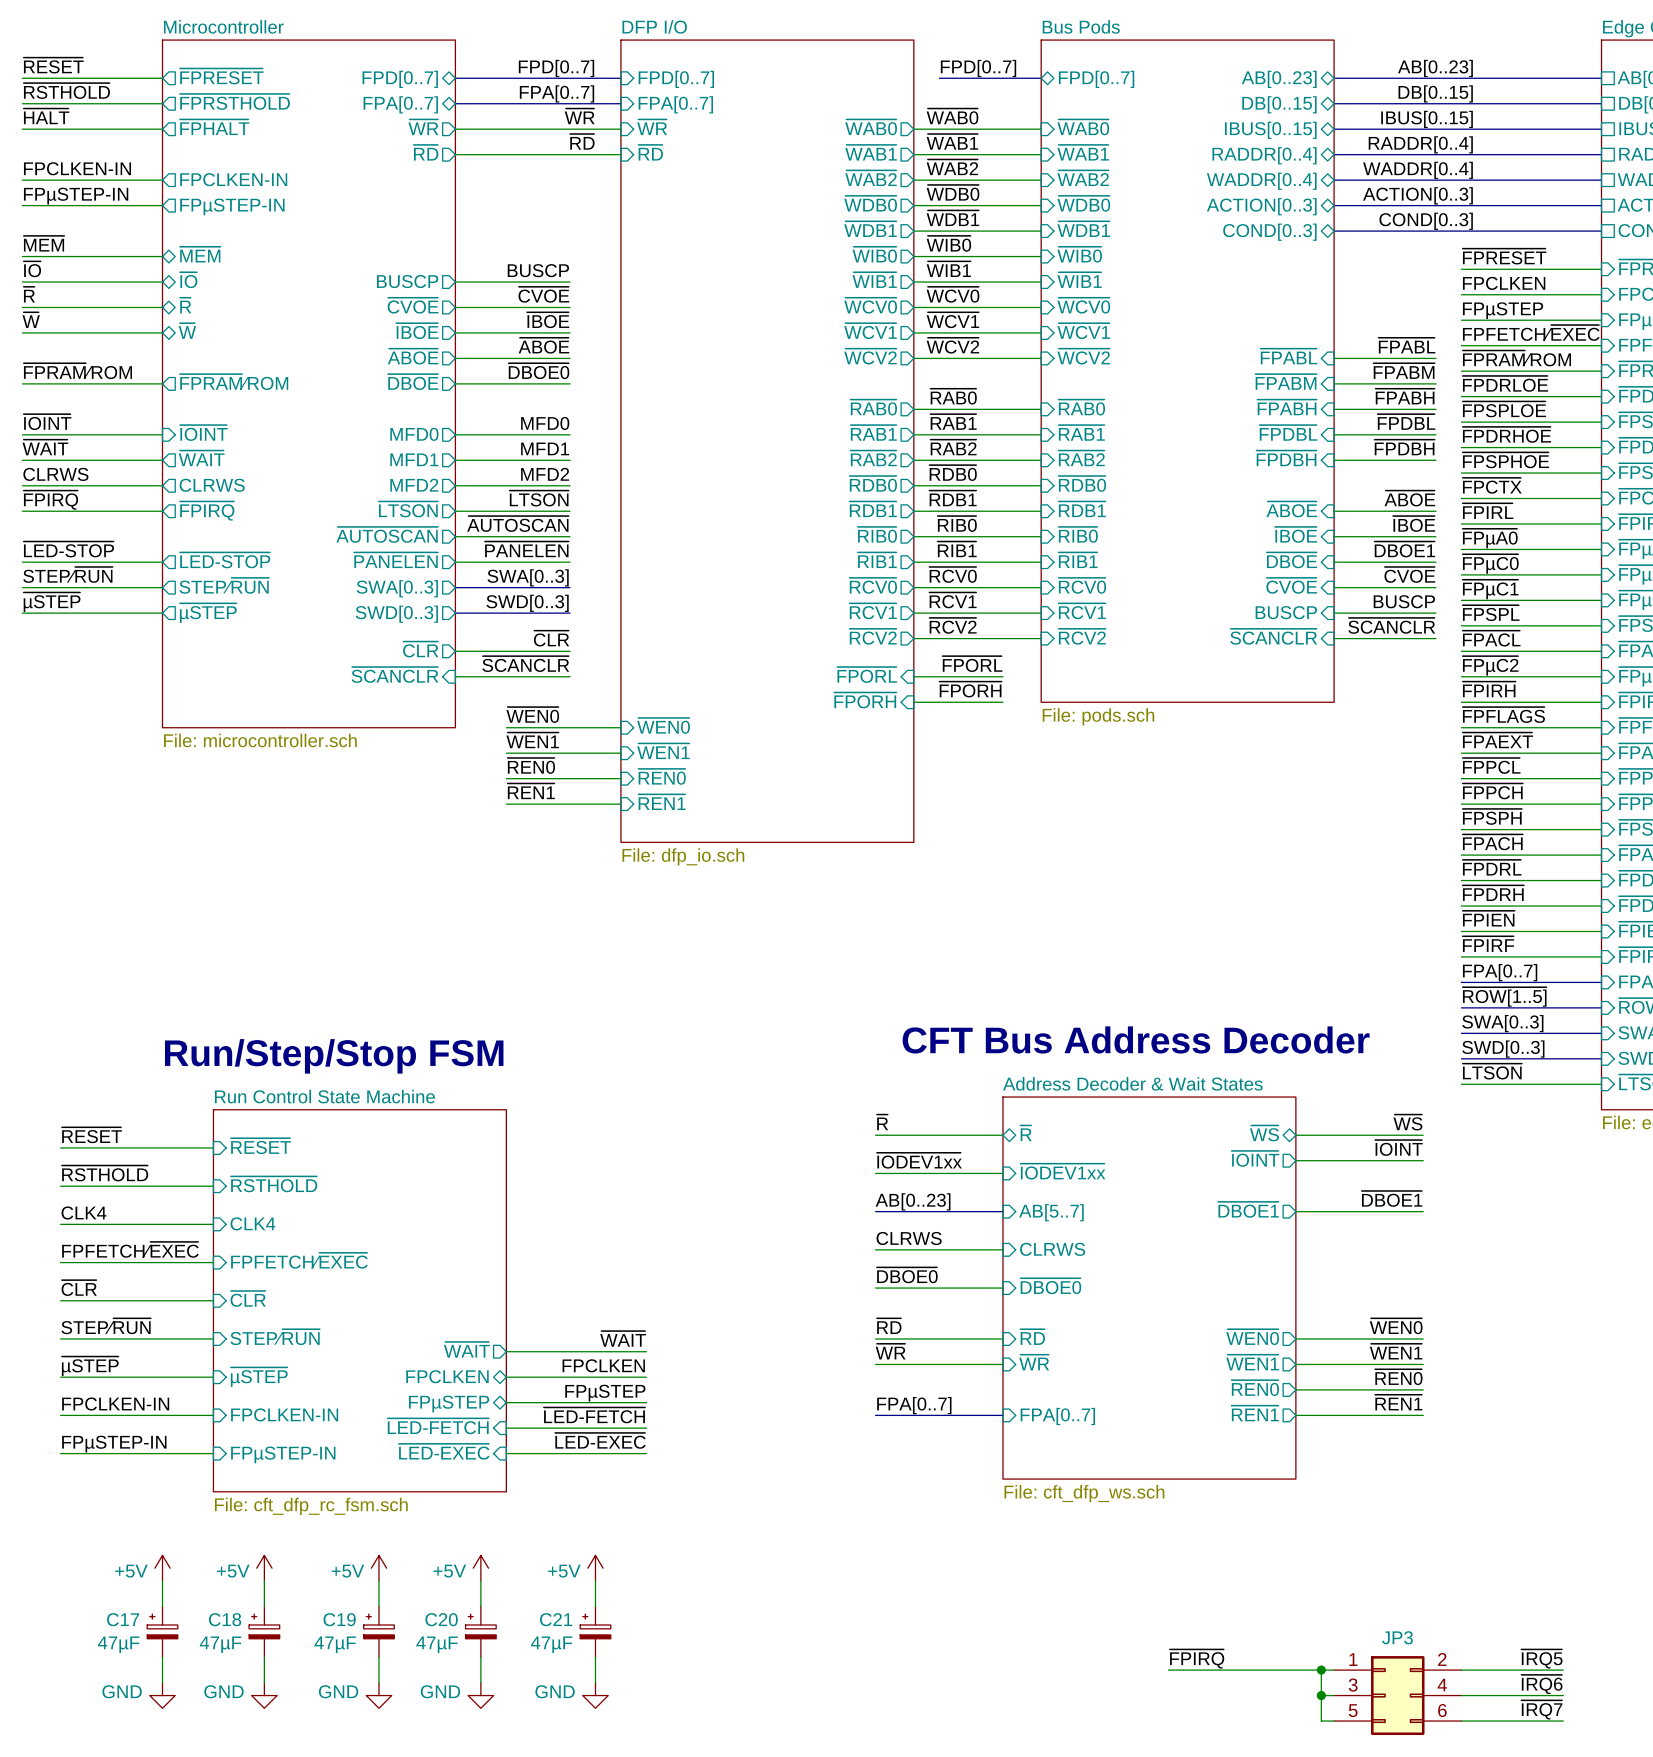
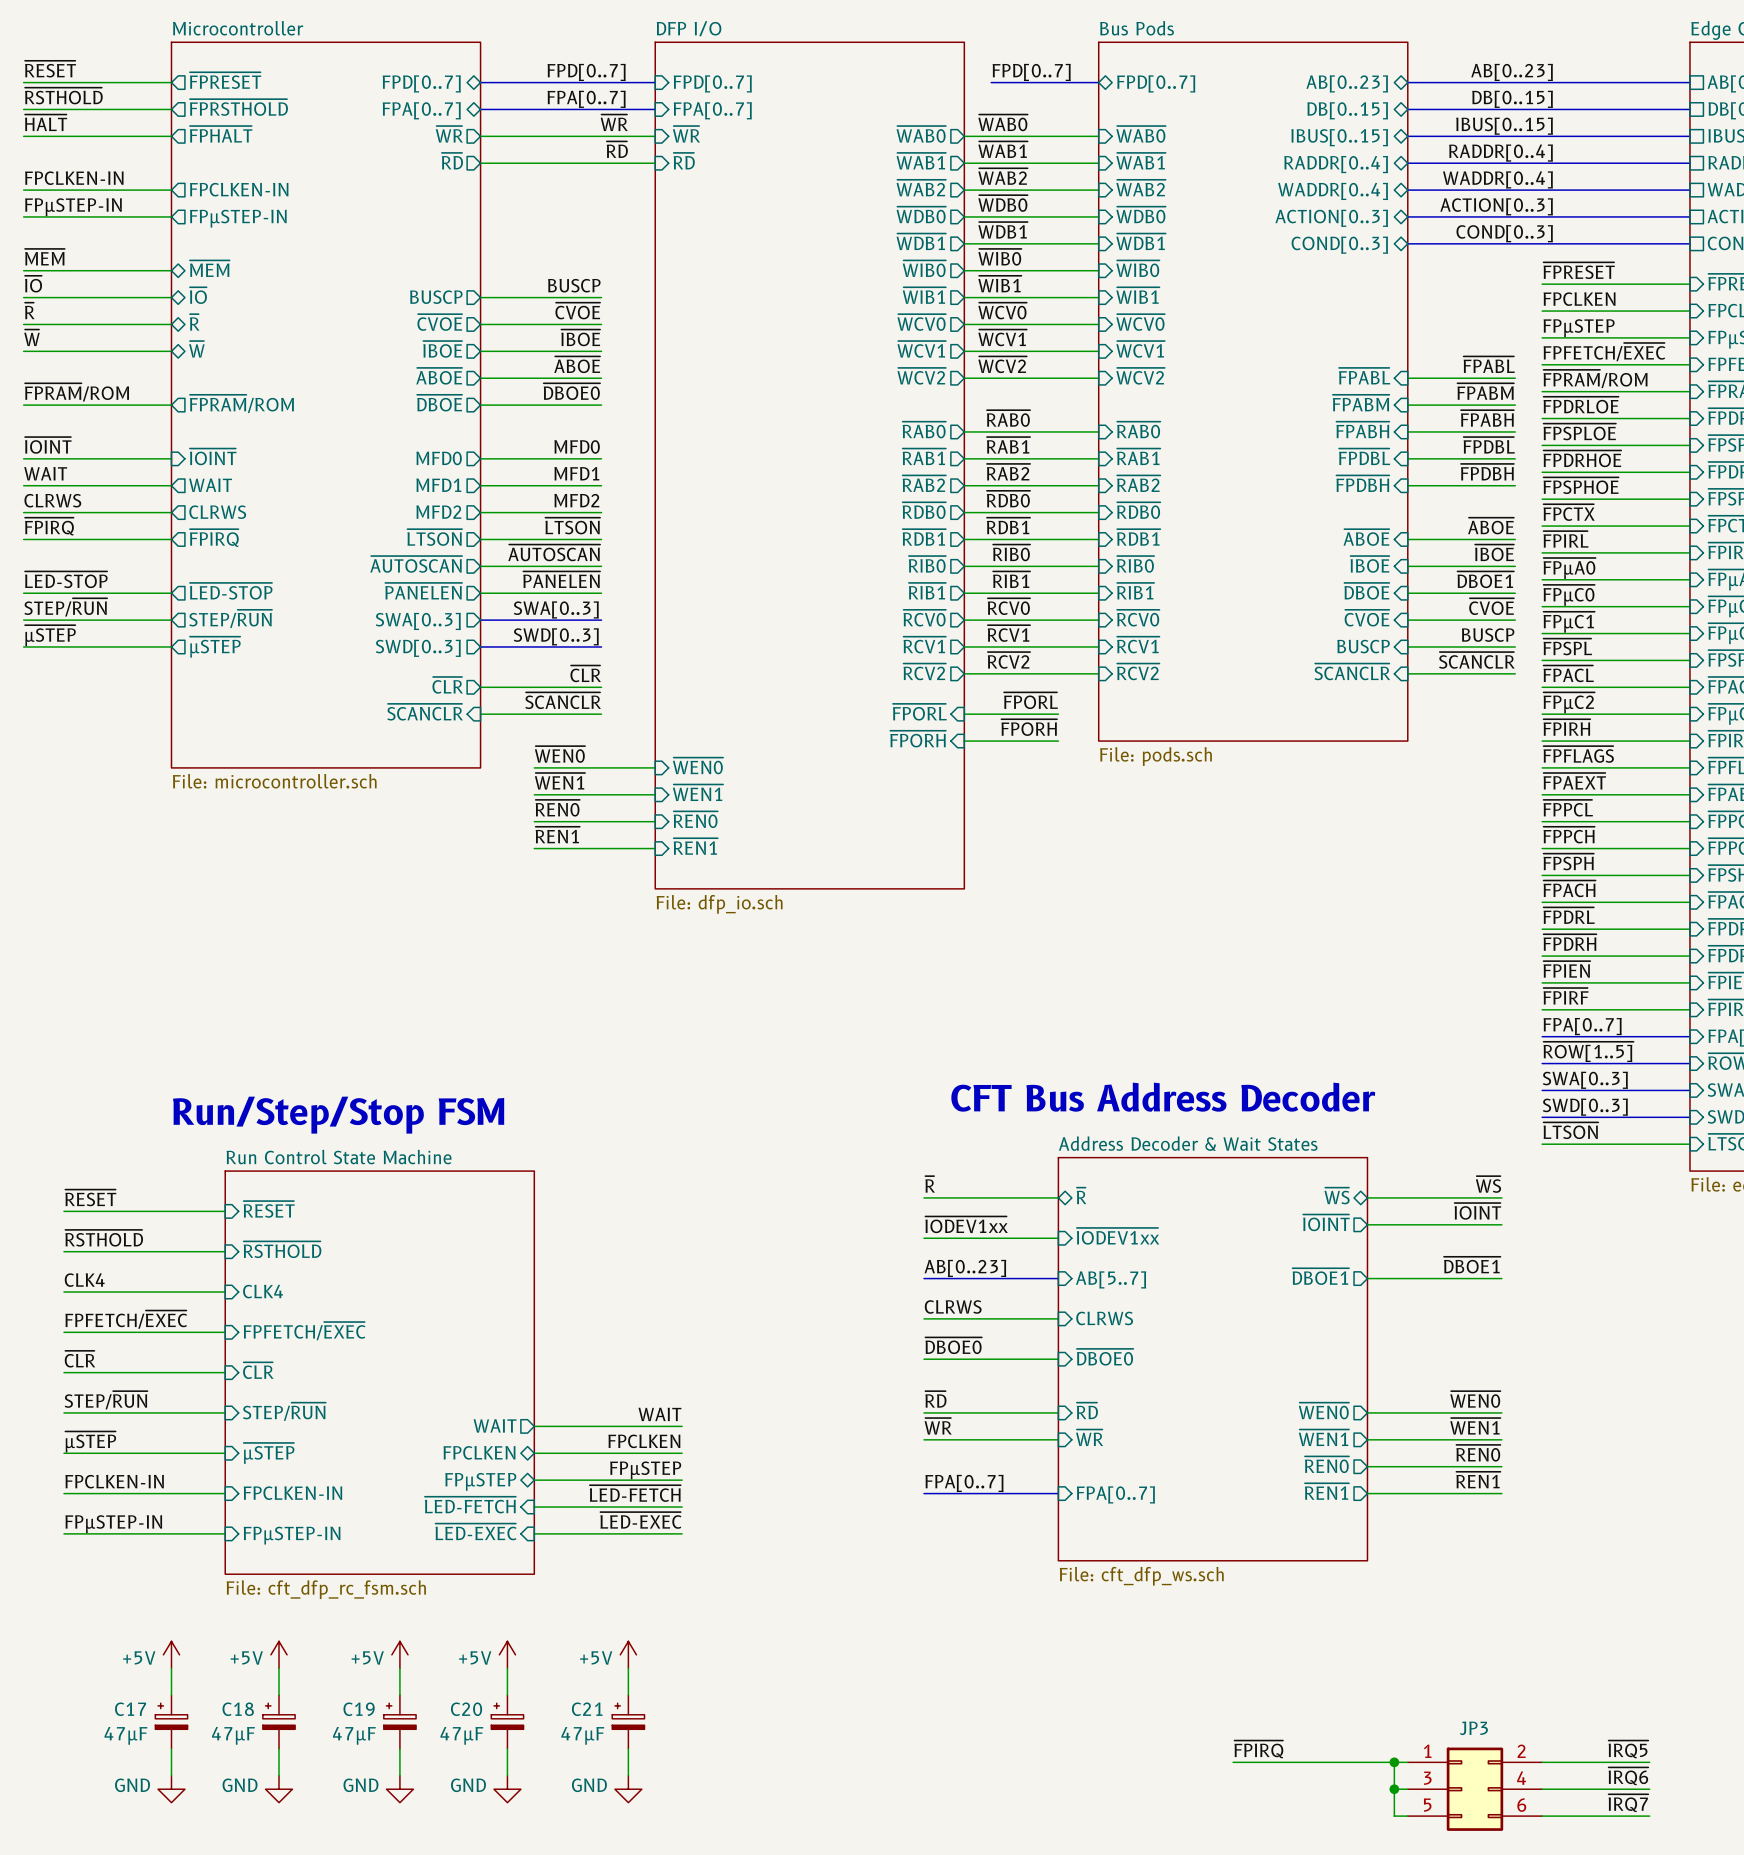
label: ~{WAIT} (45, 447) -> WAIT (45, 473)
sheet pin: ~{WAIT} (201, 458) -> WAIT (210, 485)
label: ~{WAIT} (623, 1338) -> WAIT (659, 1414)
sheet pin: ~{WAIT} (466, 1349) -> WAIT (495, 1425)

